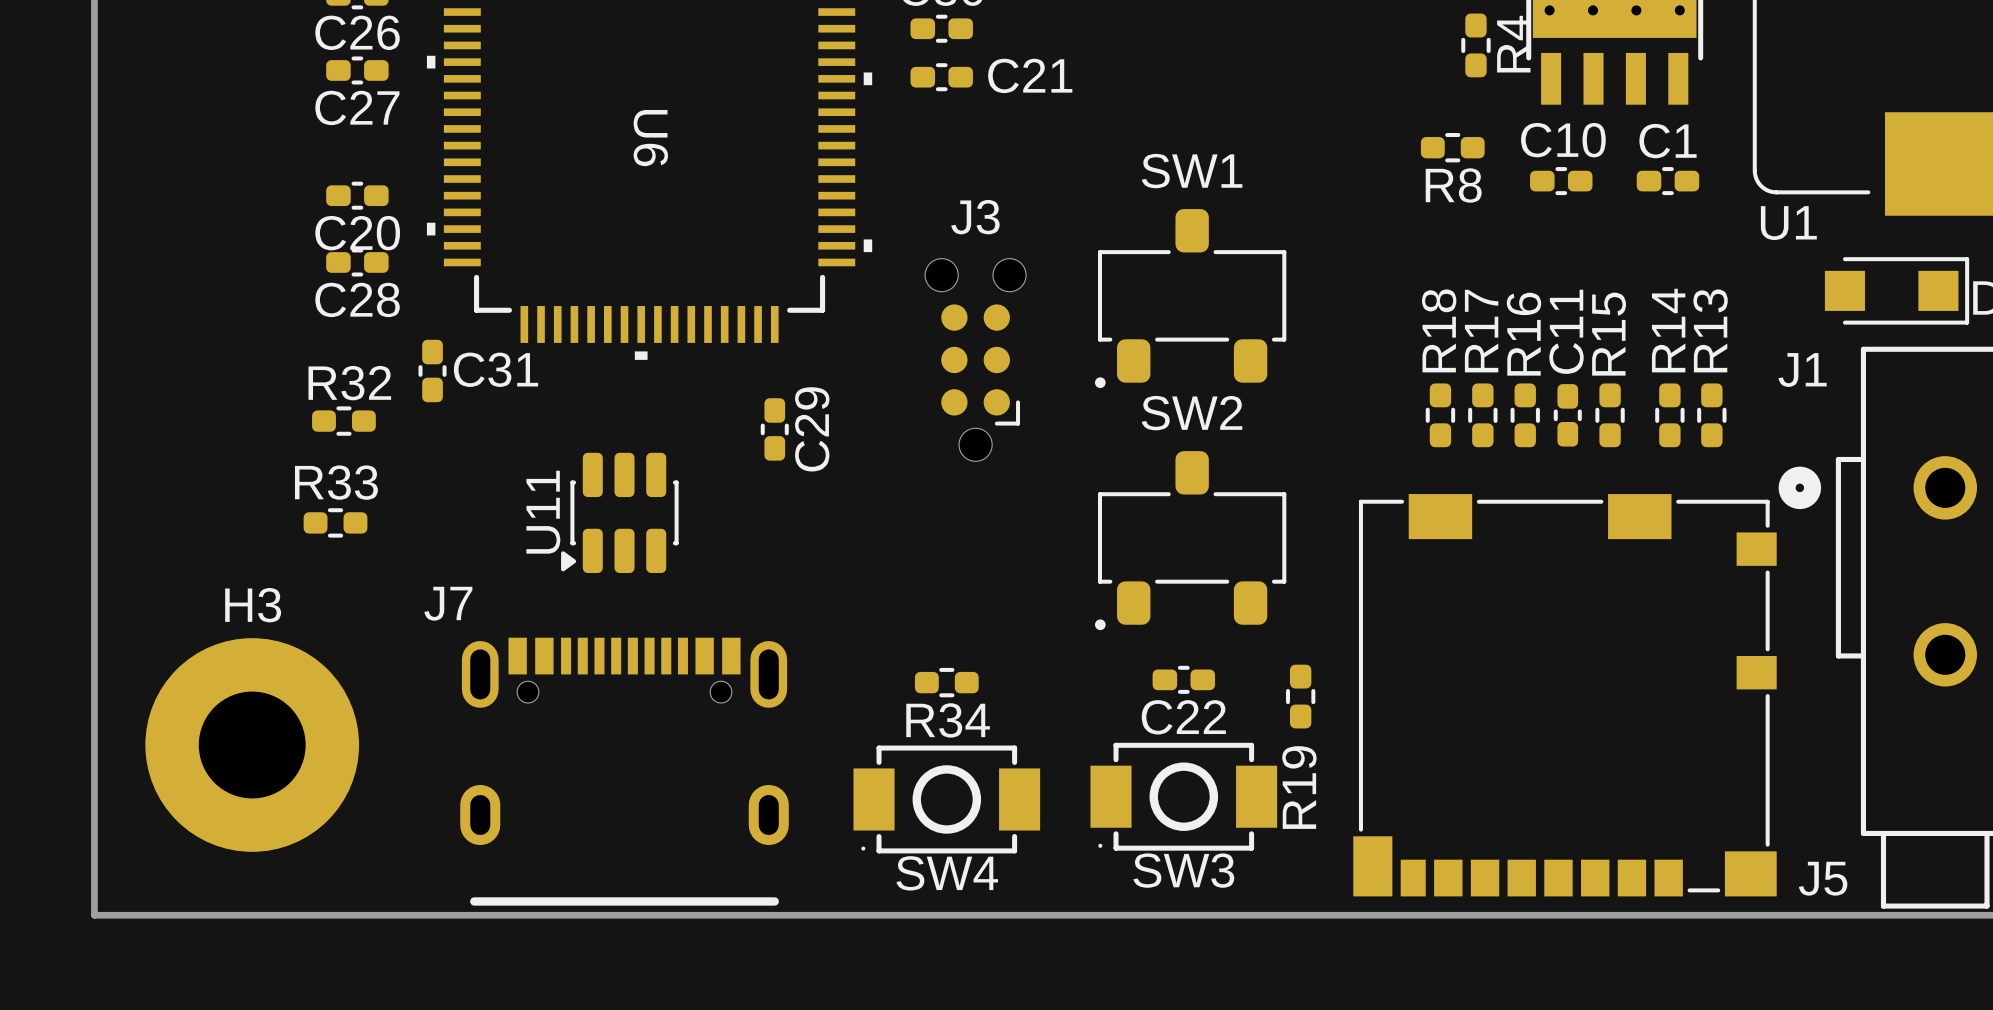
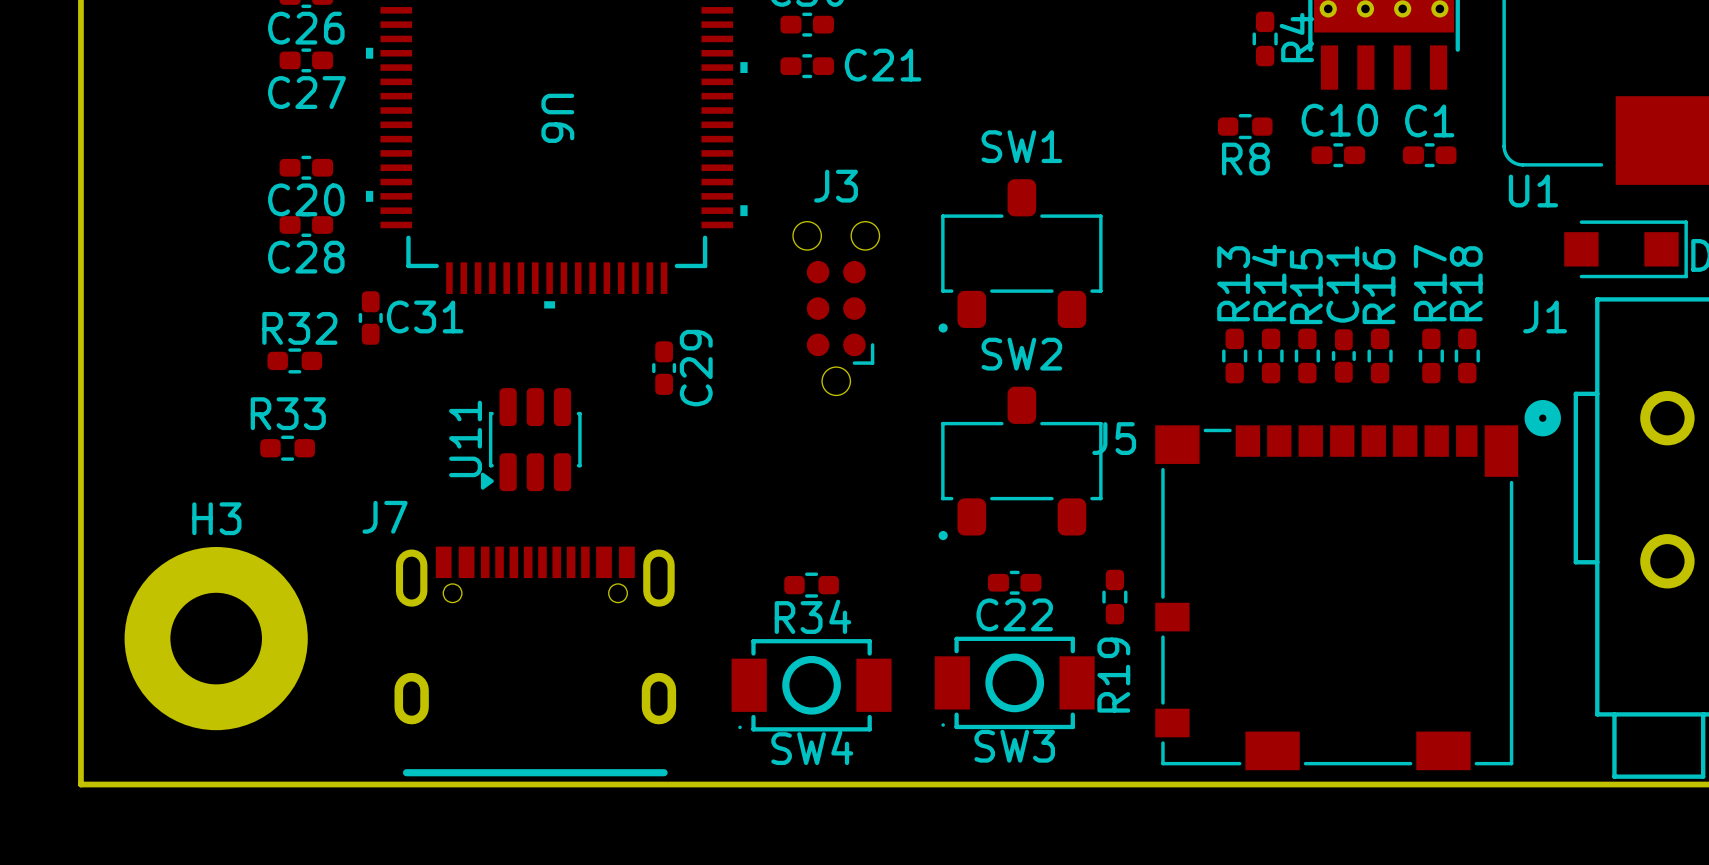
R18 name: R18 (1439, 330) -> R13 (1233, 283)
R14 name: R14 (1668, 330) -> R17 (1430, 283)
R13 name: R13 (1710, 330) -> R18 (1466, 283)
R17 name: R17 (1481, 331) -> R14 (1269, 283)
R16 name: R16 (1523, 334) -> R15 (1306, 286)
R15 name: R15 (1609, 334) -> R16 (1379, 286)
J5 rotation: 0° (1564, 695) -> 180° (1336, 597)

